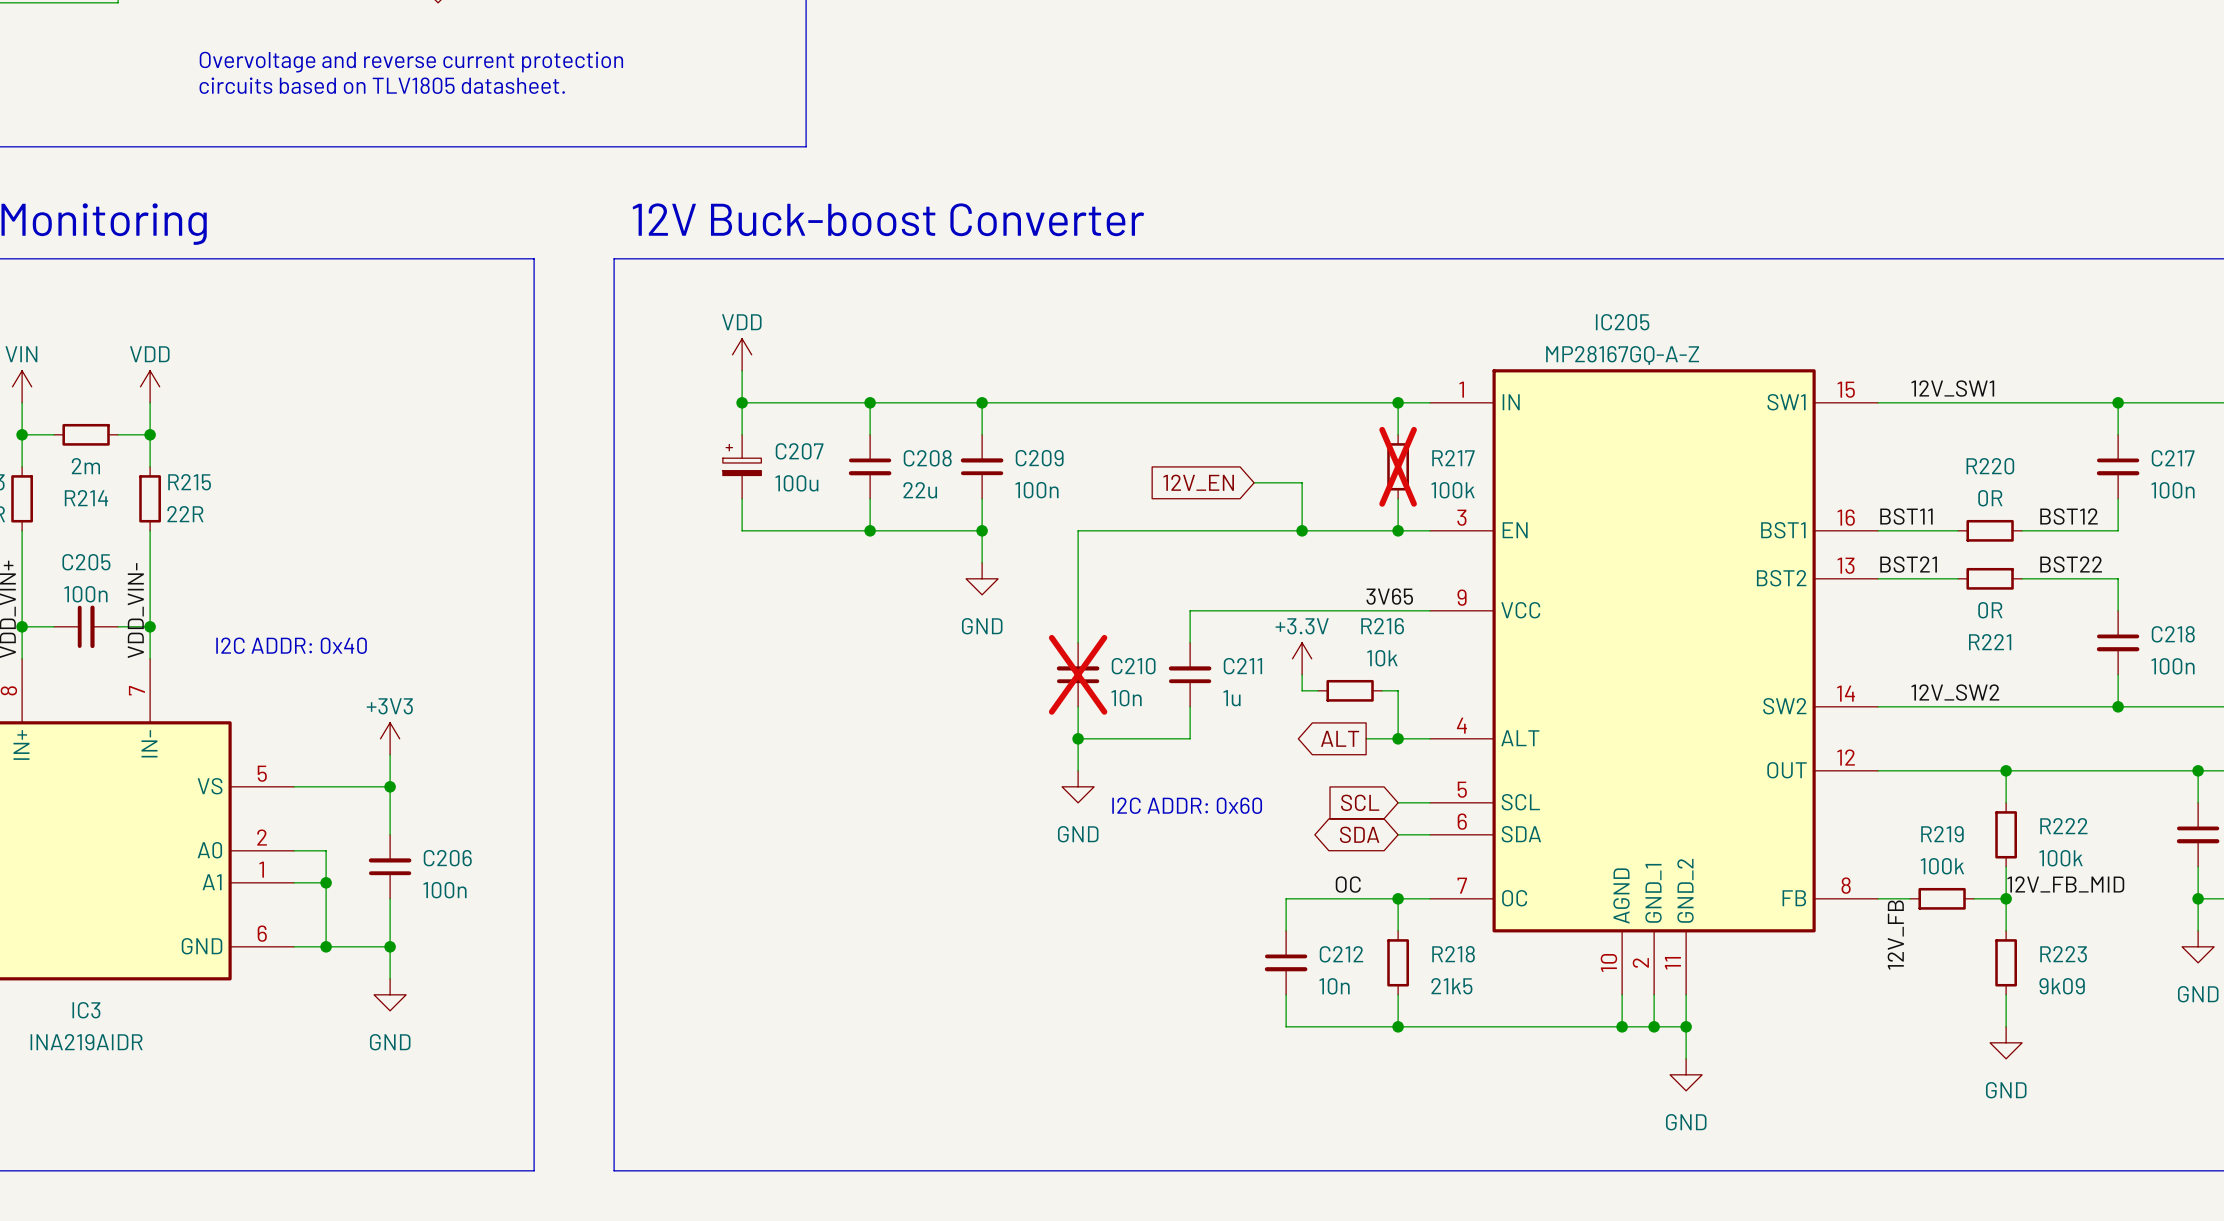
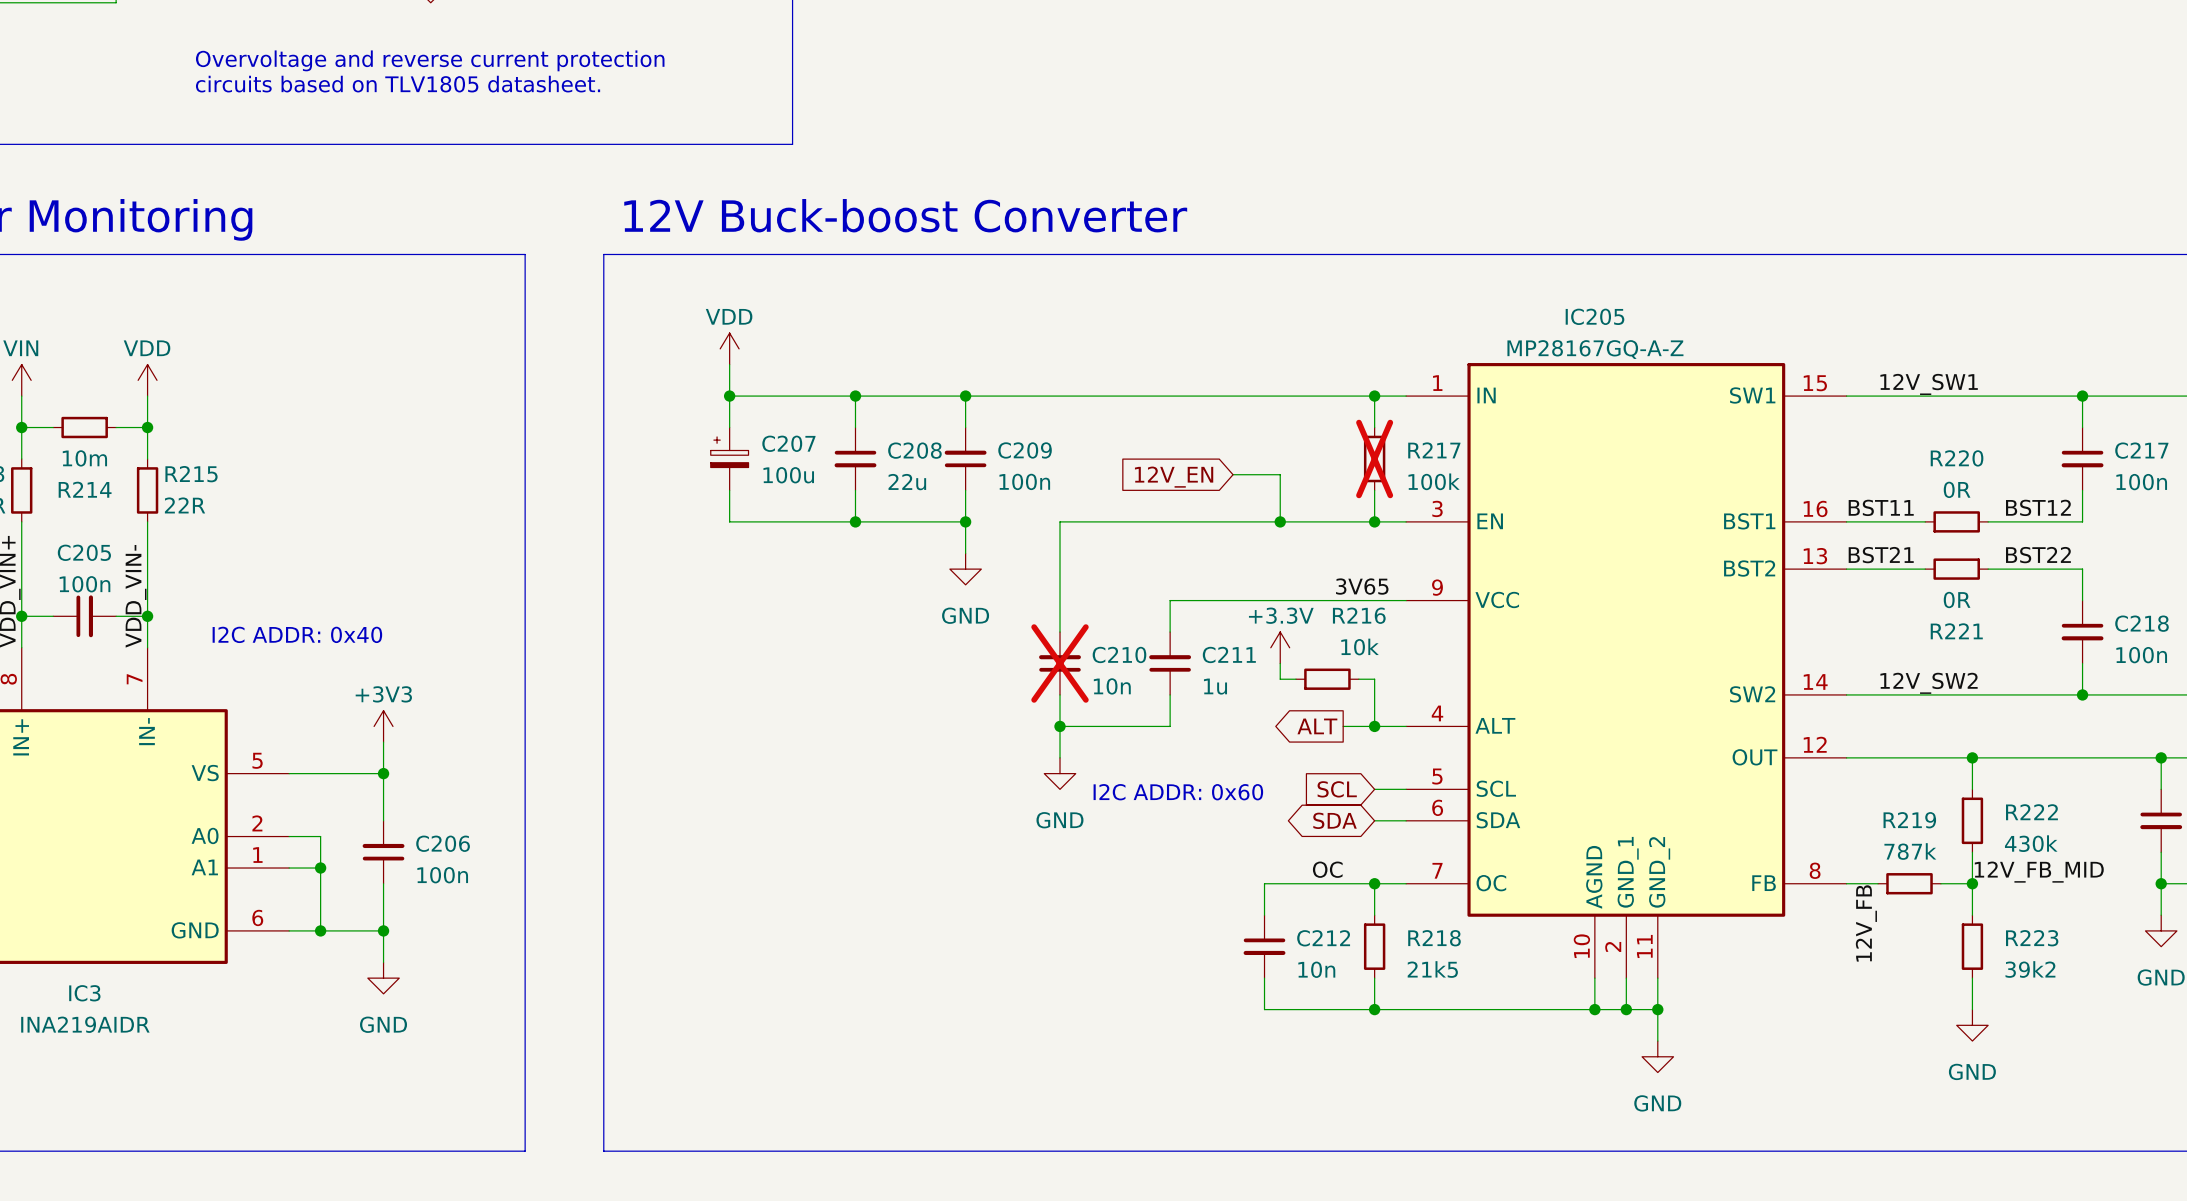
R214 value: 2m (85, 466) -> 10m (84, 458)
R222 value: 100k (2061, 858) -> 430k (2031, 843)
R219 value: 100k (1942, 866) -> 787k (1910, 851)
R223 value: 9k09 (2062, 986) -> 39k2 (2030, 969)

